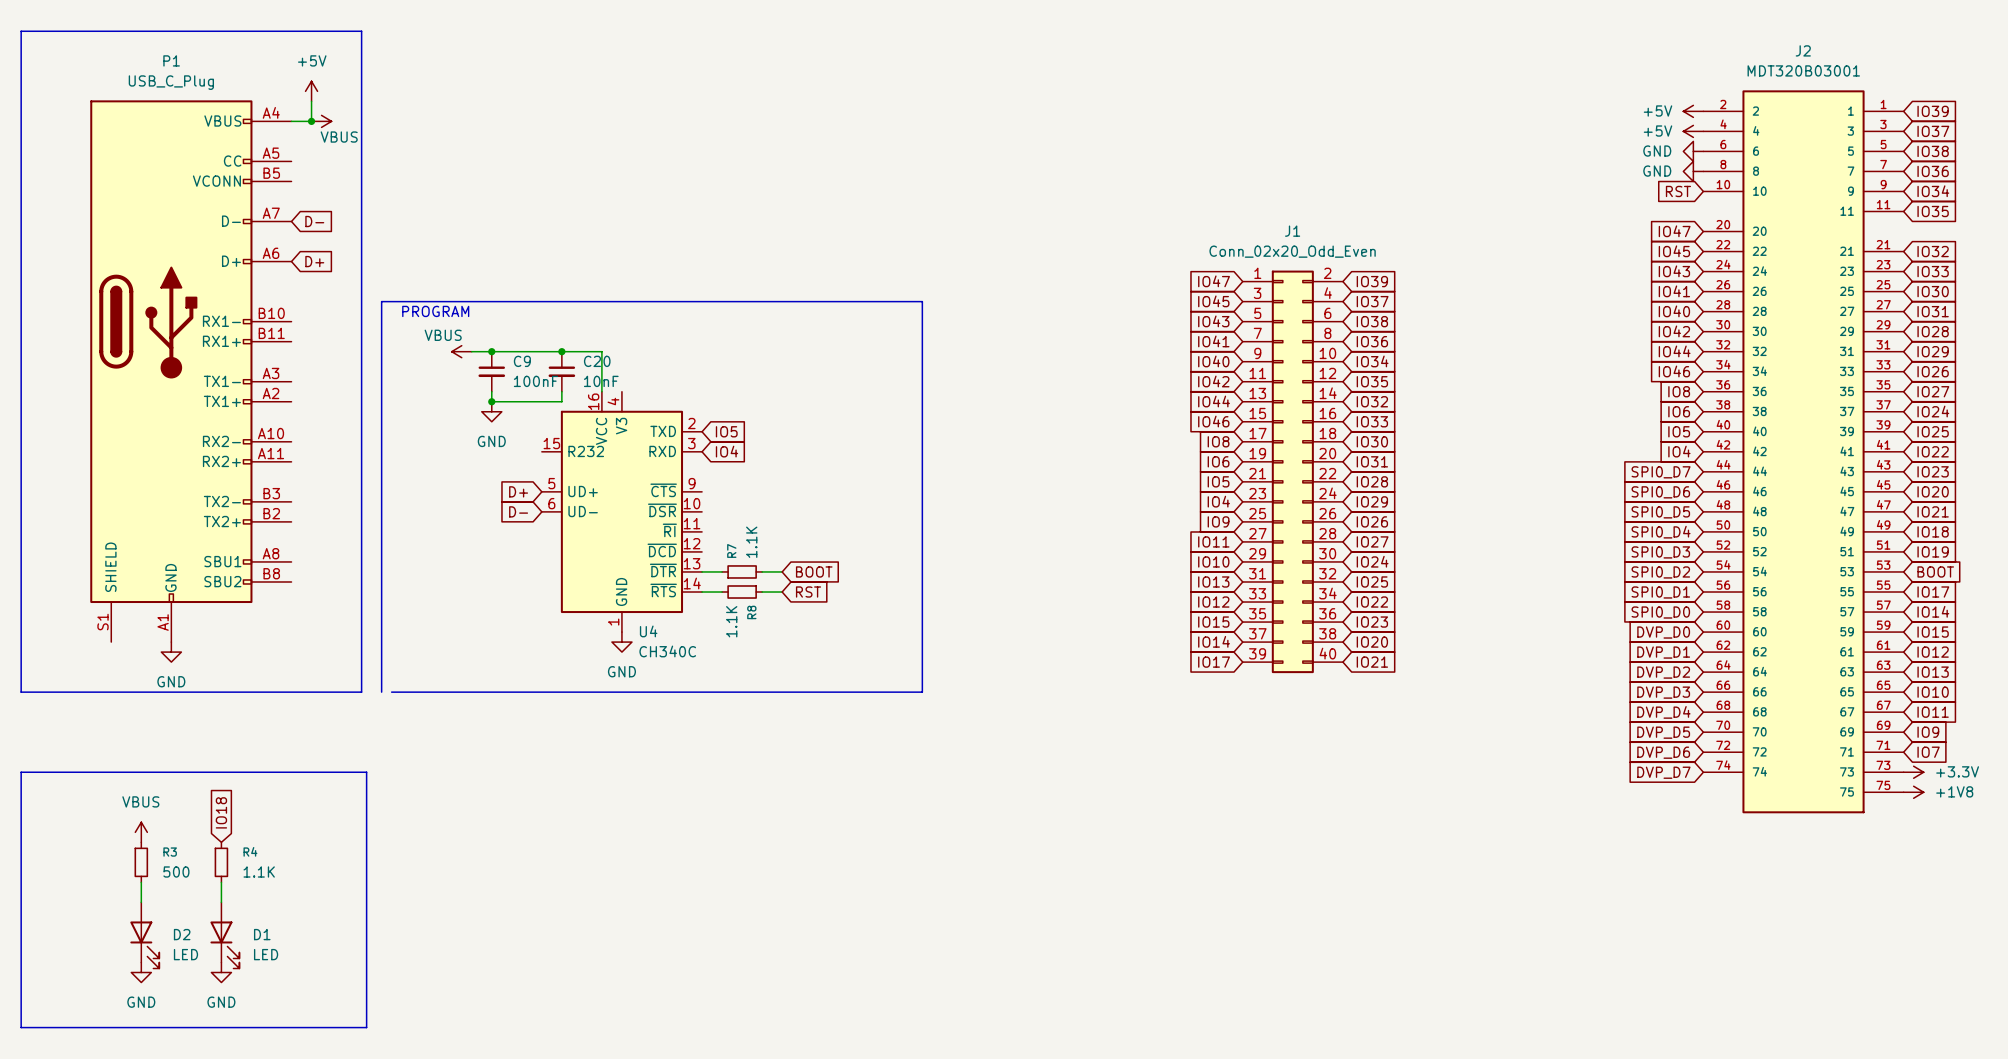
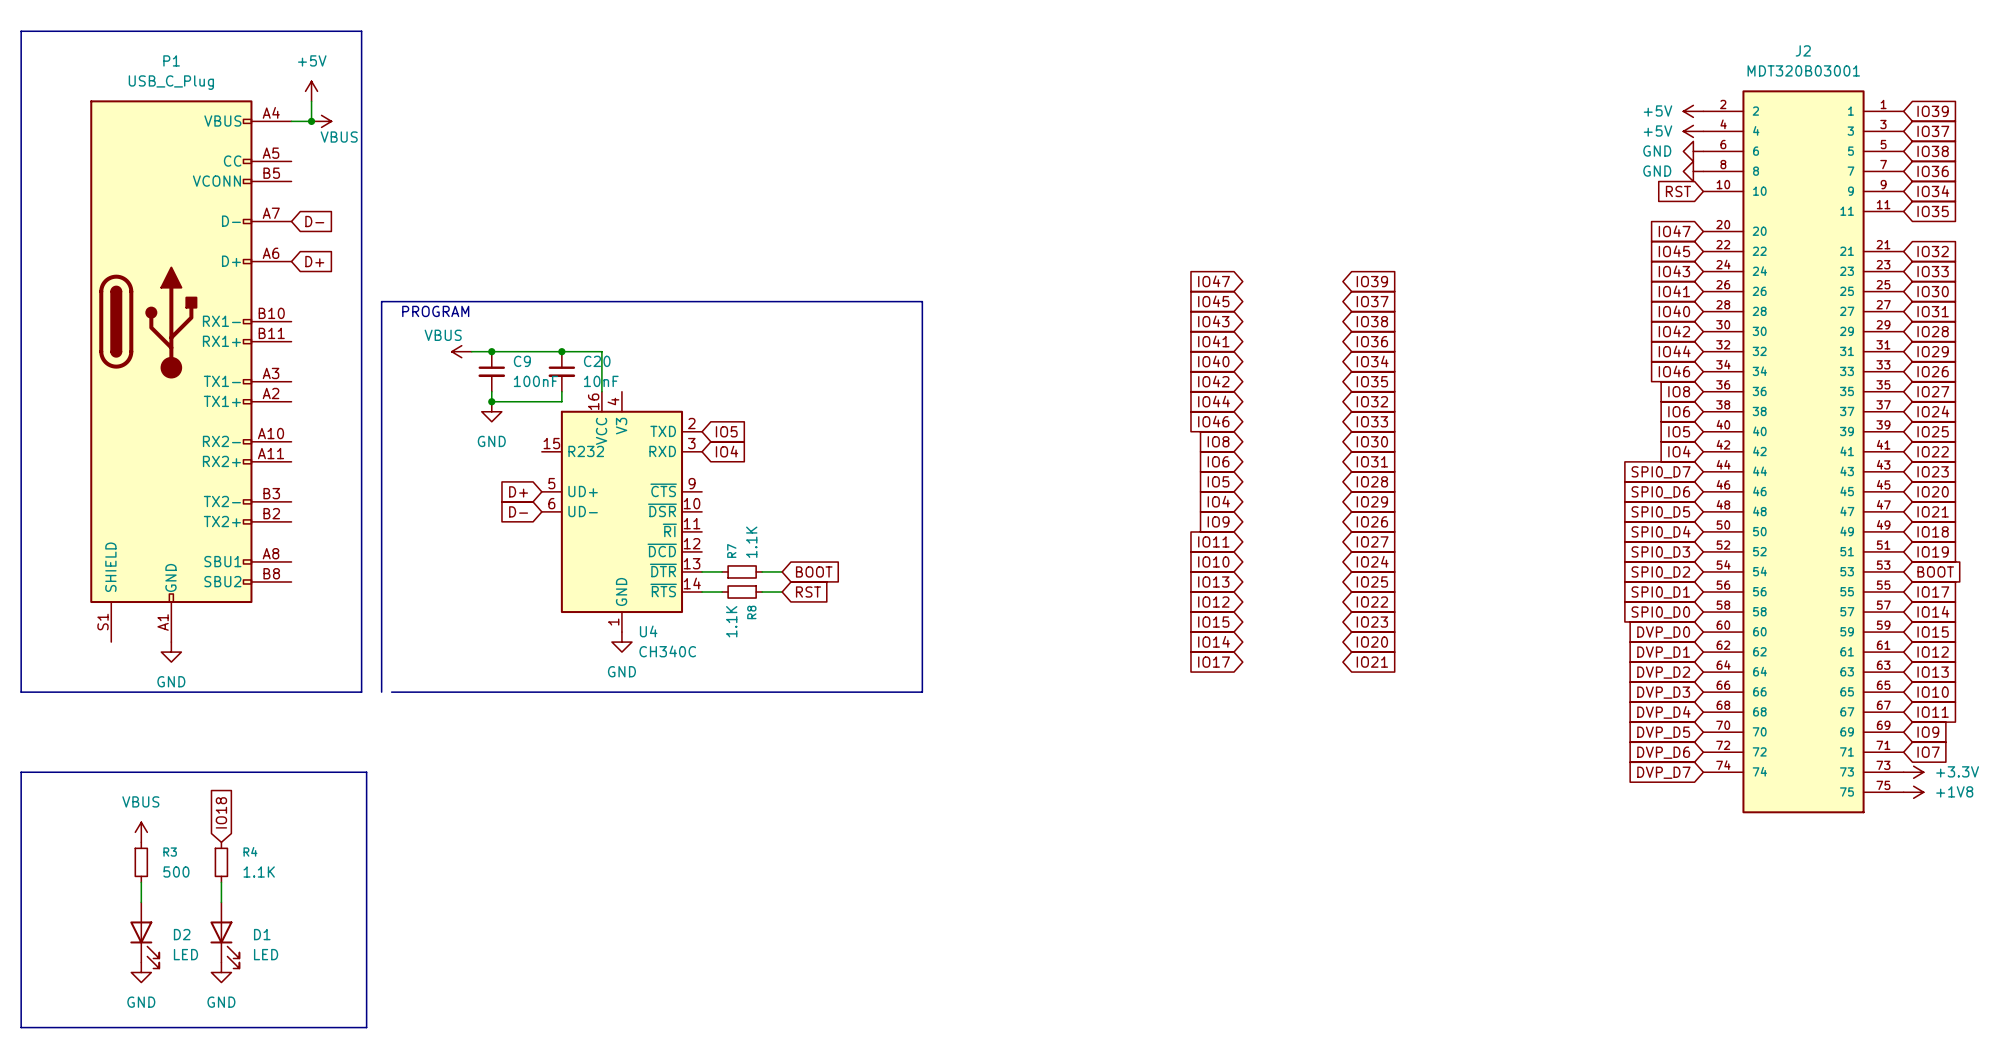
J1: Conn_02x20_Odd_Even (1292, 471) -> none

